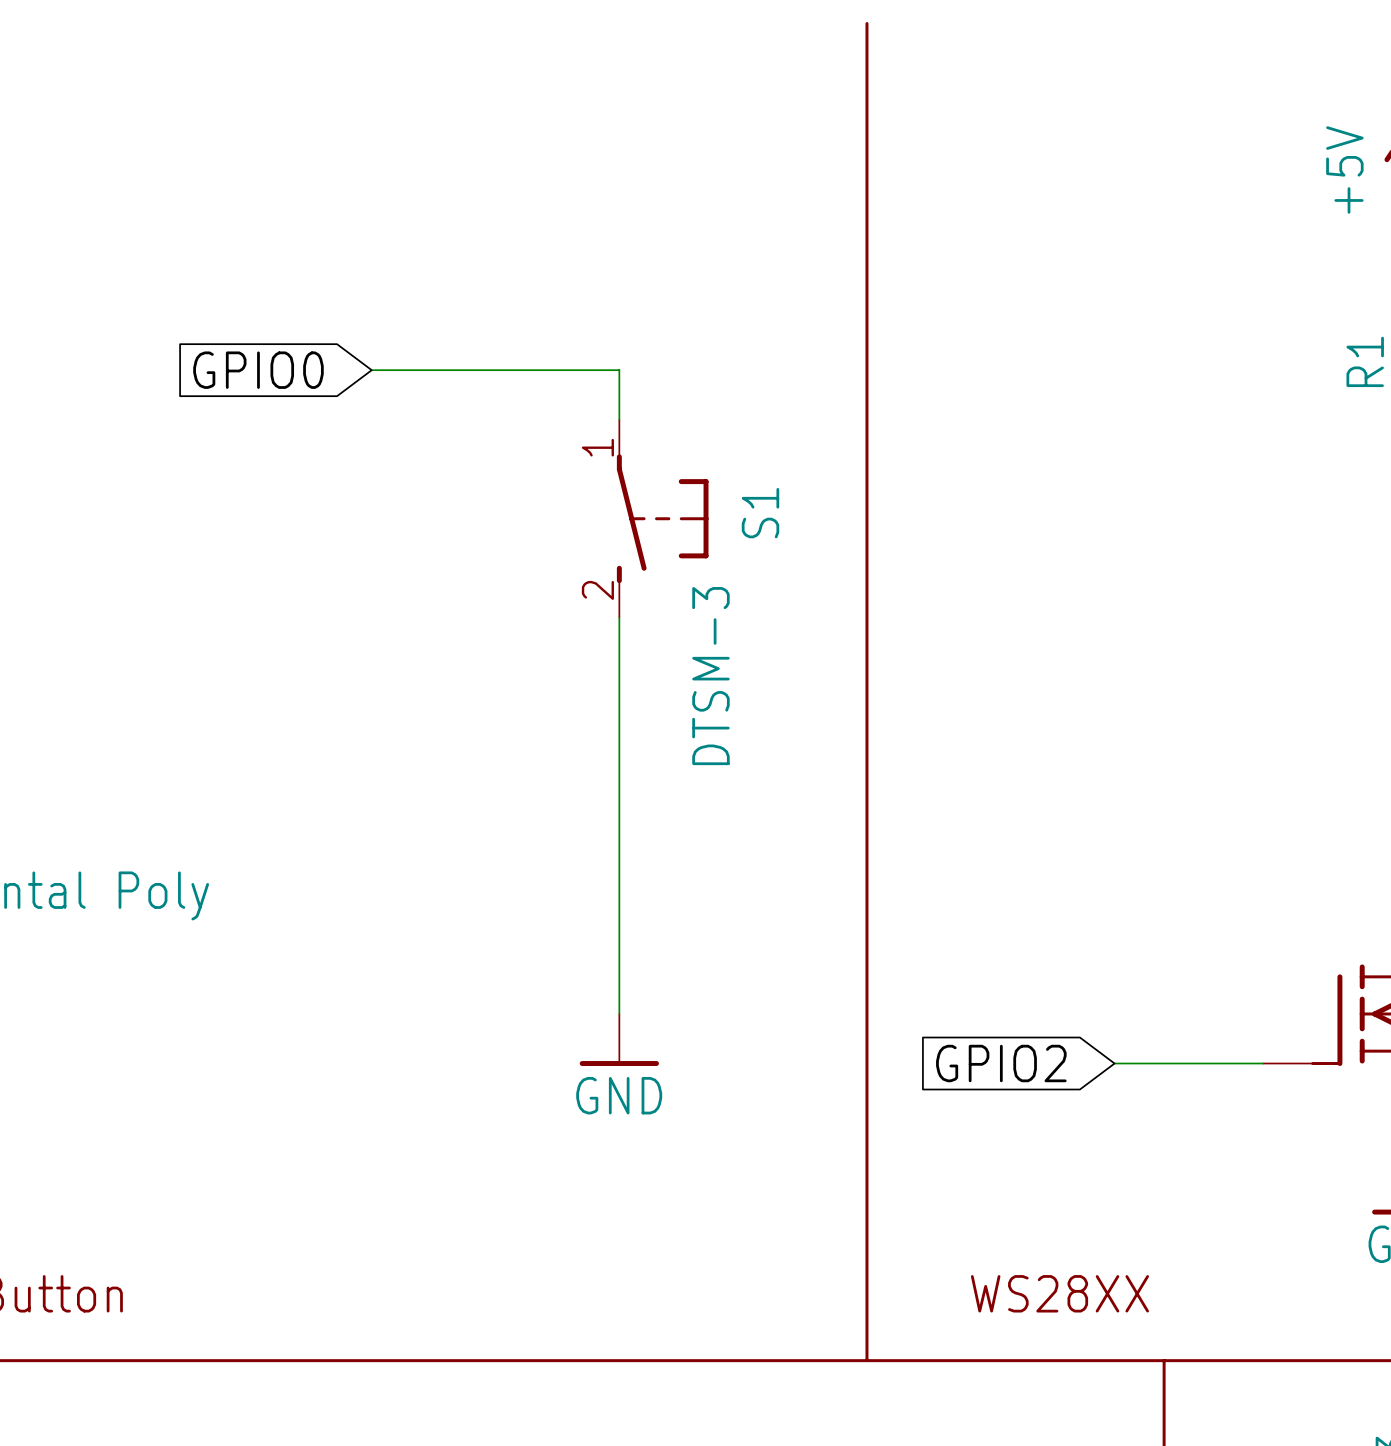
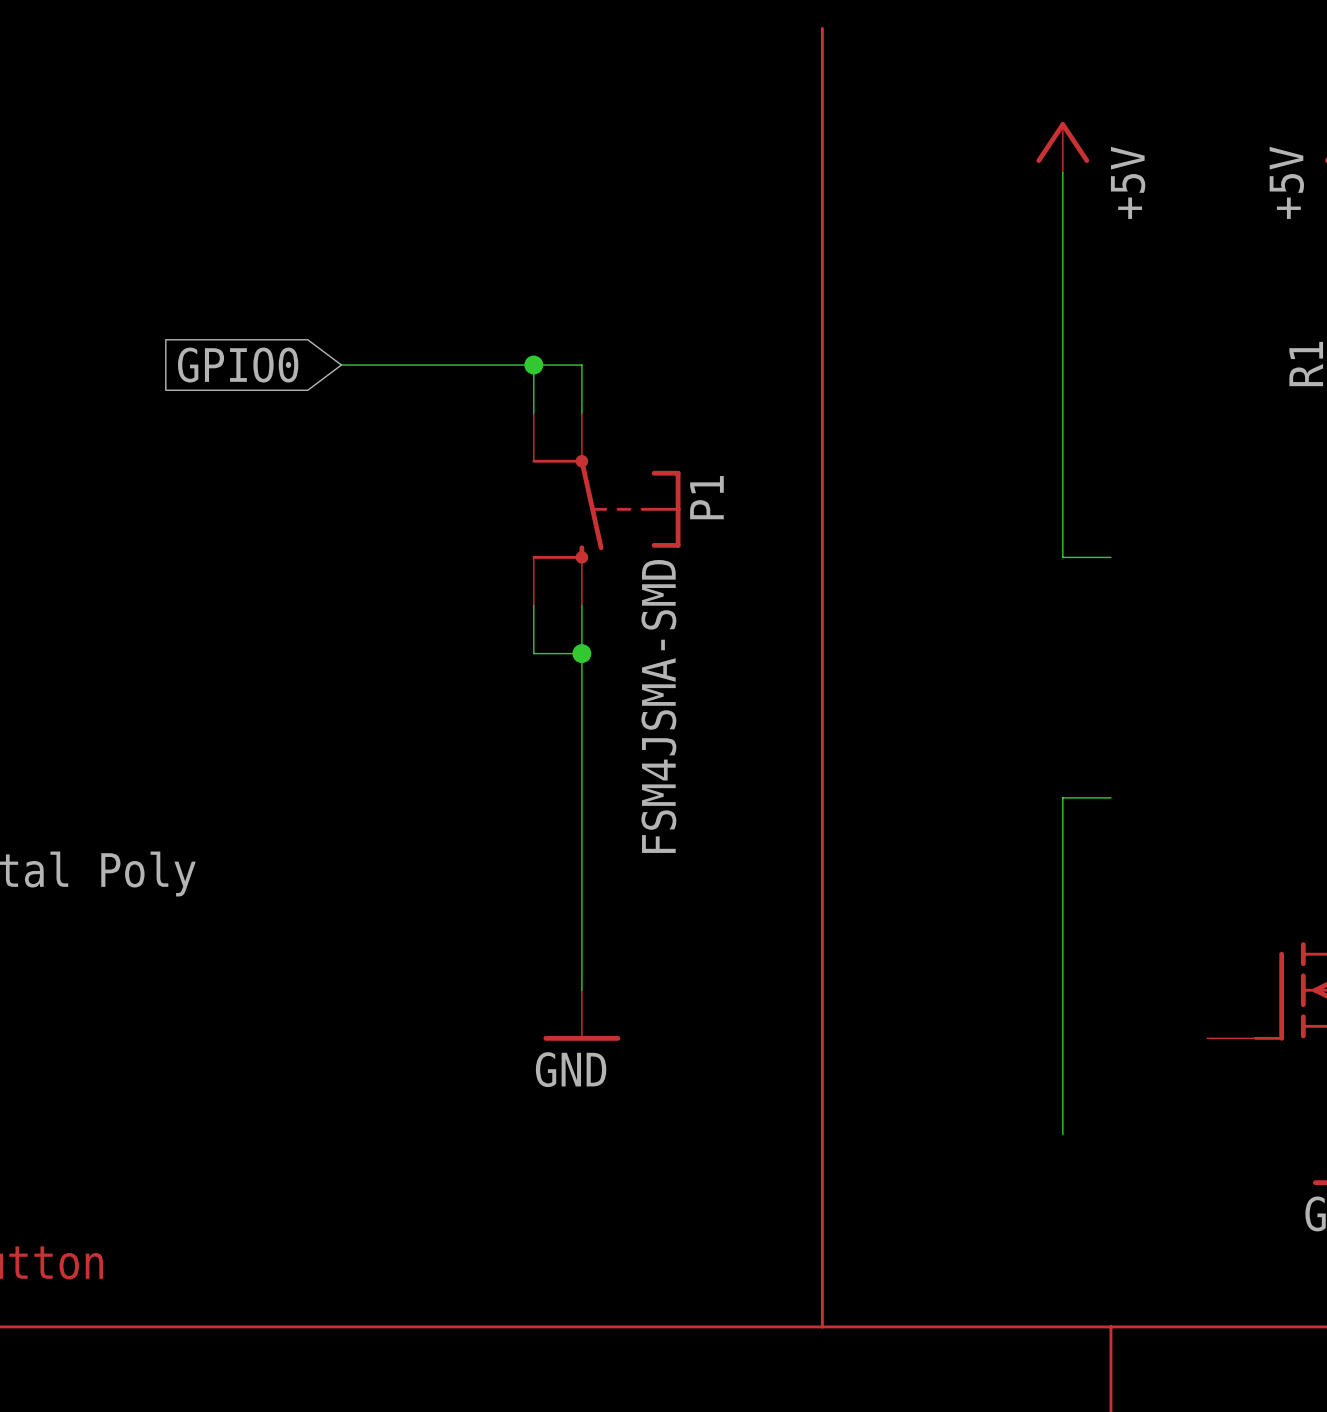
power symbol: none -> +5V (1062, 147)
wire: none -> (1062, 172) (1062, 557) (1110, 557)
wire: none -> (533, 365) (533, 413)
junction: none -> (533, 365)
P1: none -> FSM4JSMA-SMD (606, 509)
S1: DTSM-3 (662, 518) -> none
wire: none -> (533, 605) (533, 653) (581, 653)
junction: none -> (581, 653)
wire: none -> (1110, 797) (1062, 797) (1062, 1134)
global label: GPIO2 (1001, 1063) -> none
wire: (1114, 1063) (1263, 1063) -> none
text: WS28XX (1059, 1293) -> none

